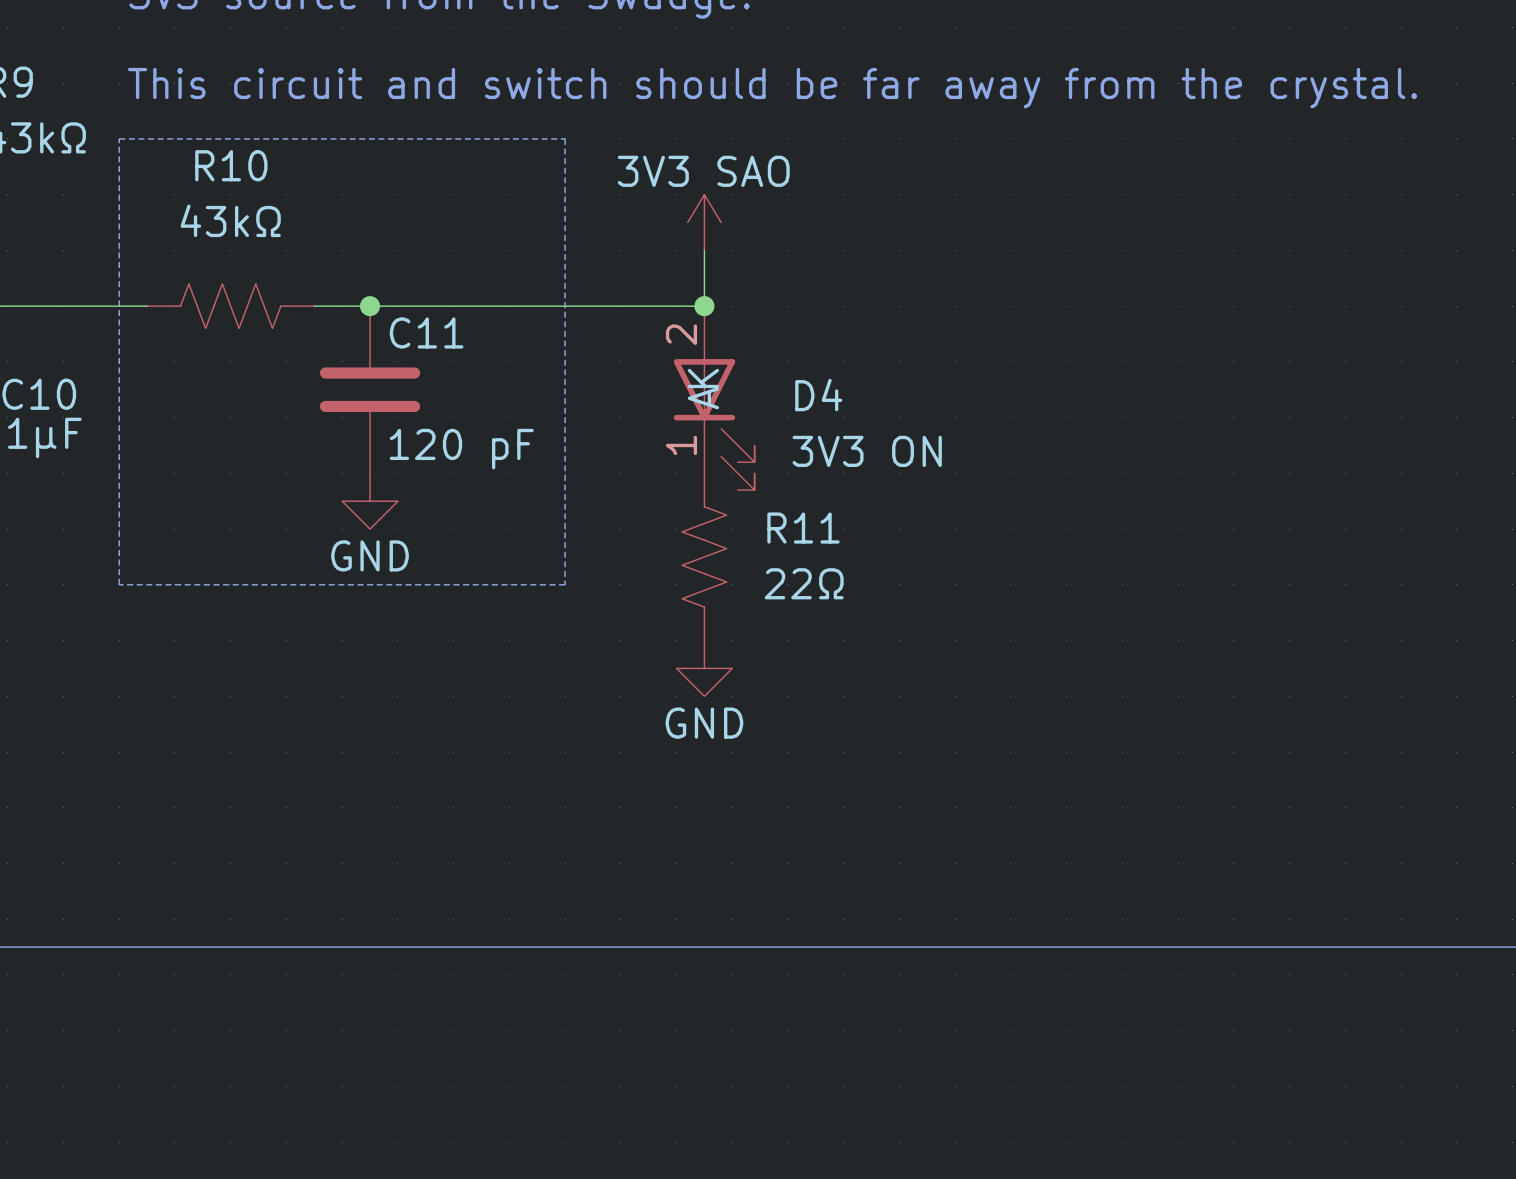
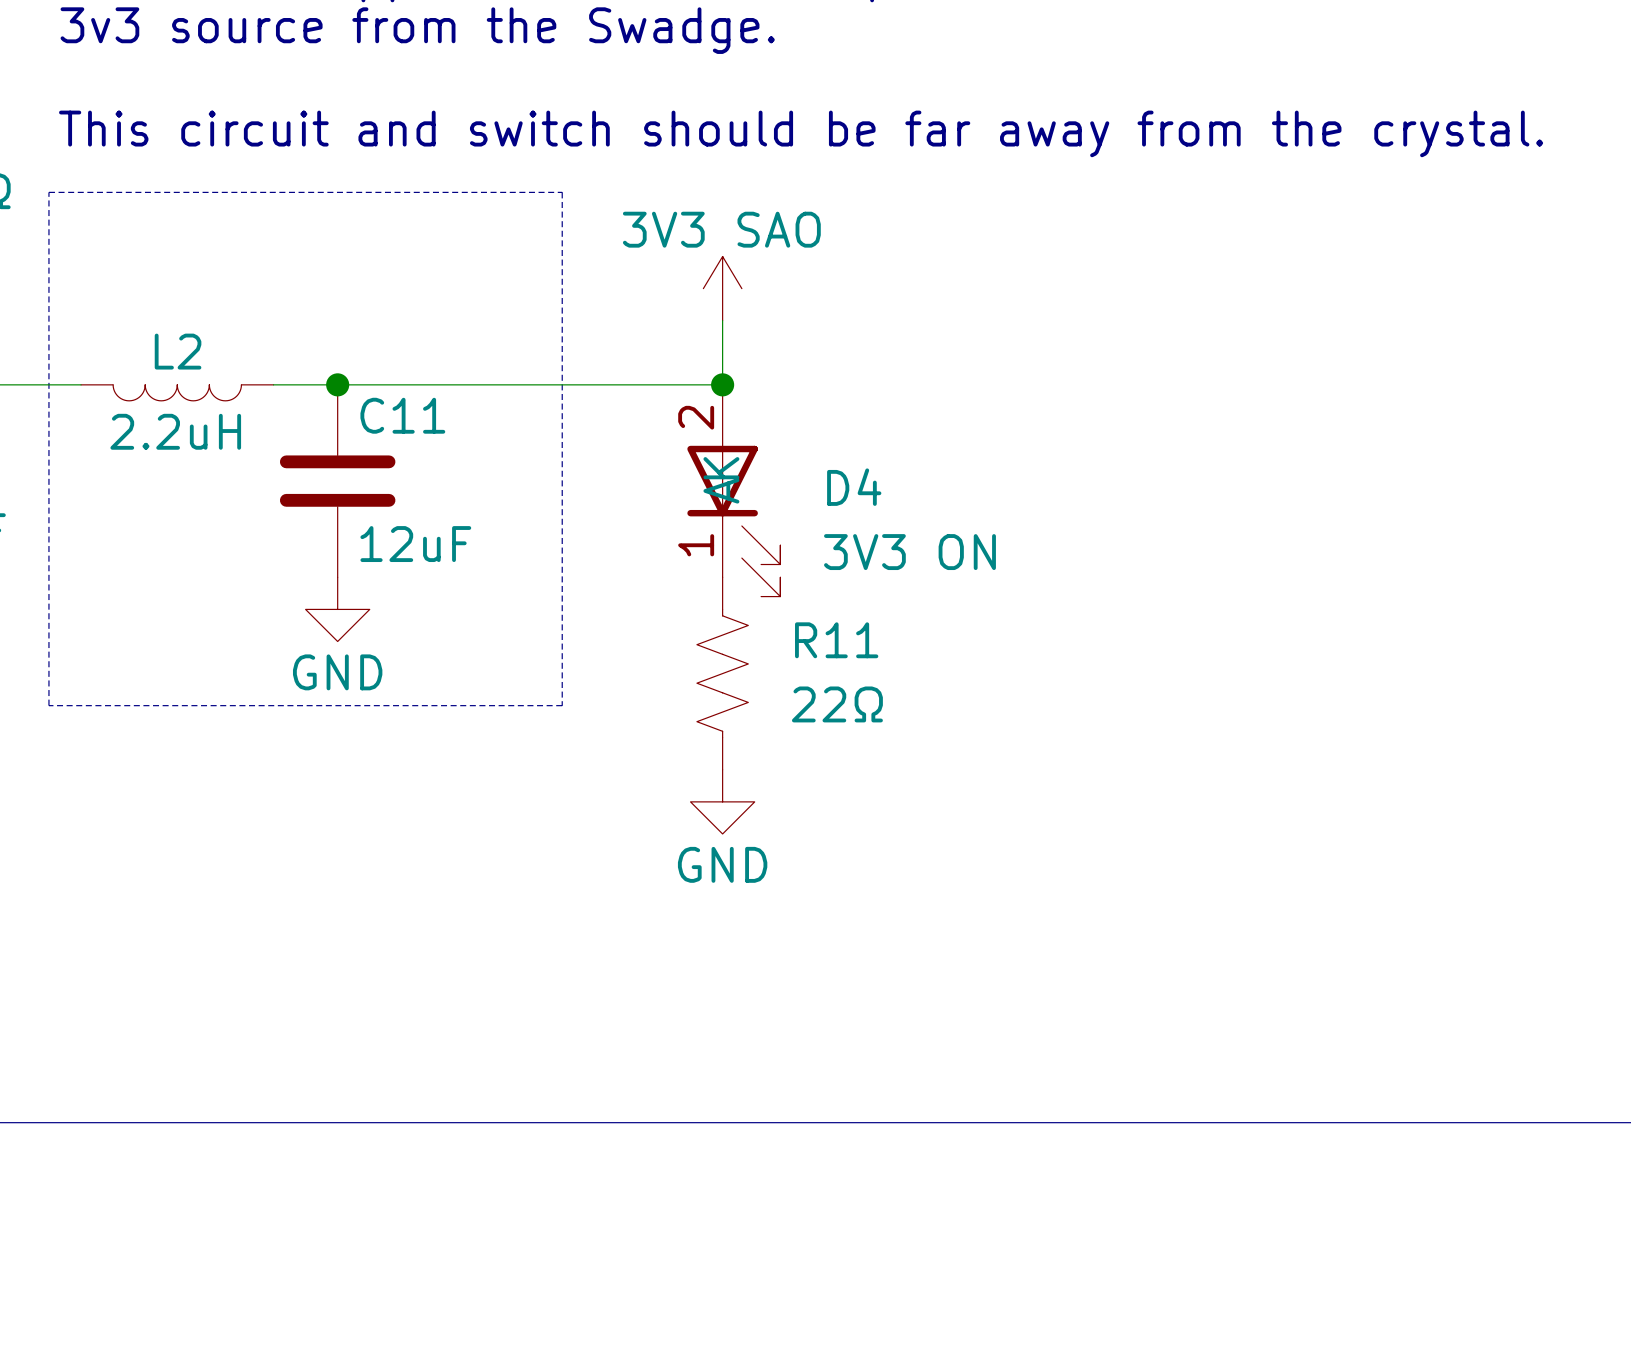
R10: 43kΩ (230, 306) -> none
L2: none -> 2.2uH (177, 392)
C11 value: 120 pF (461, 449) -> 12uF (415, 544)

